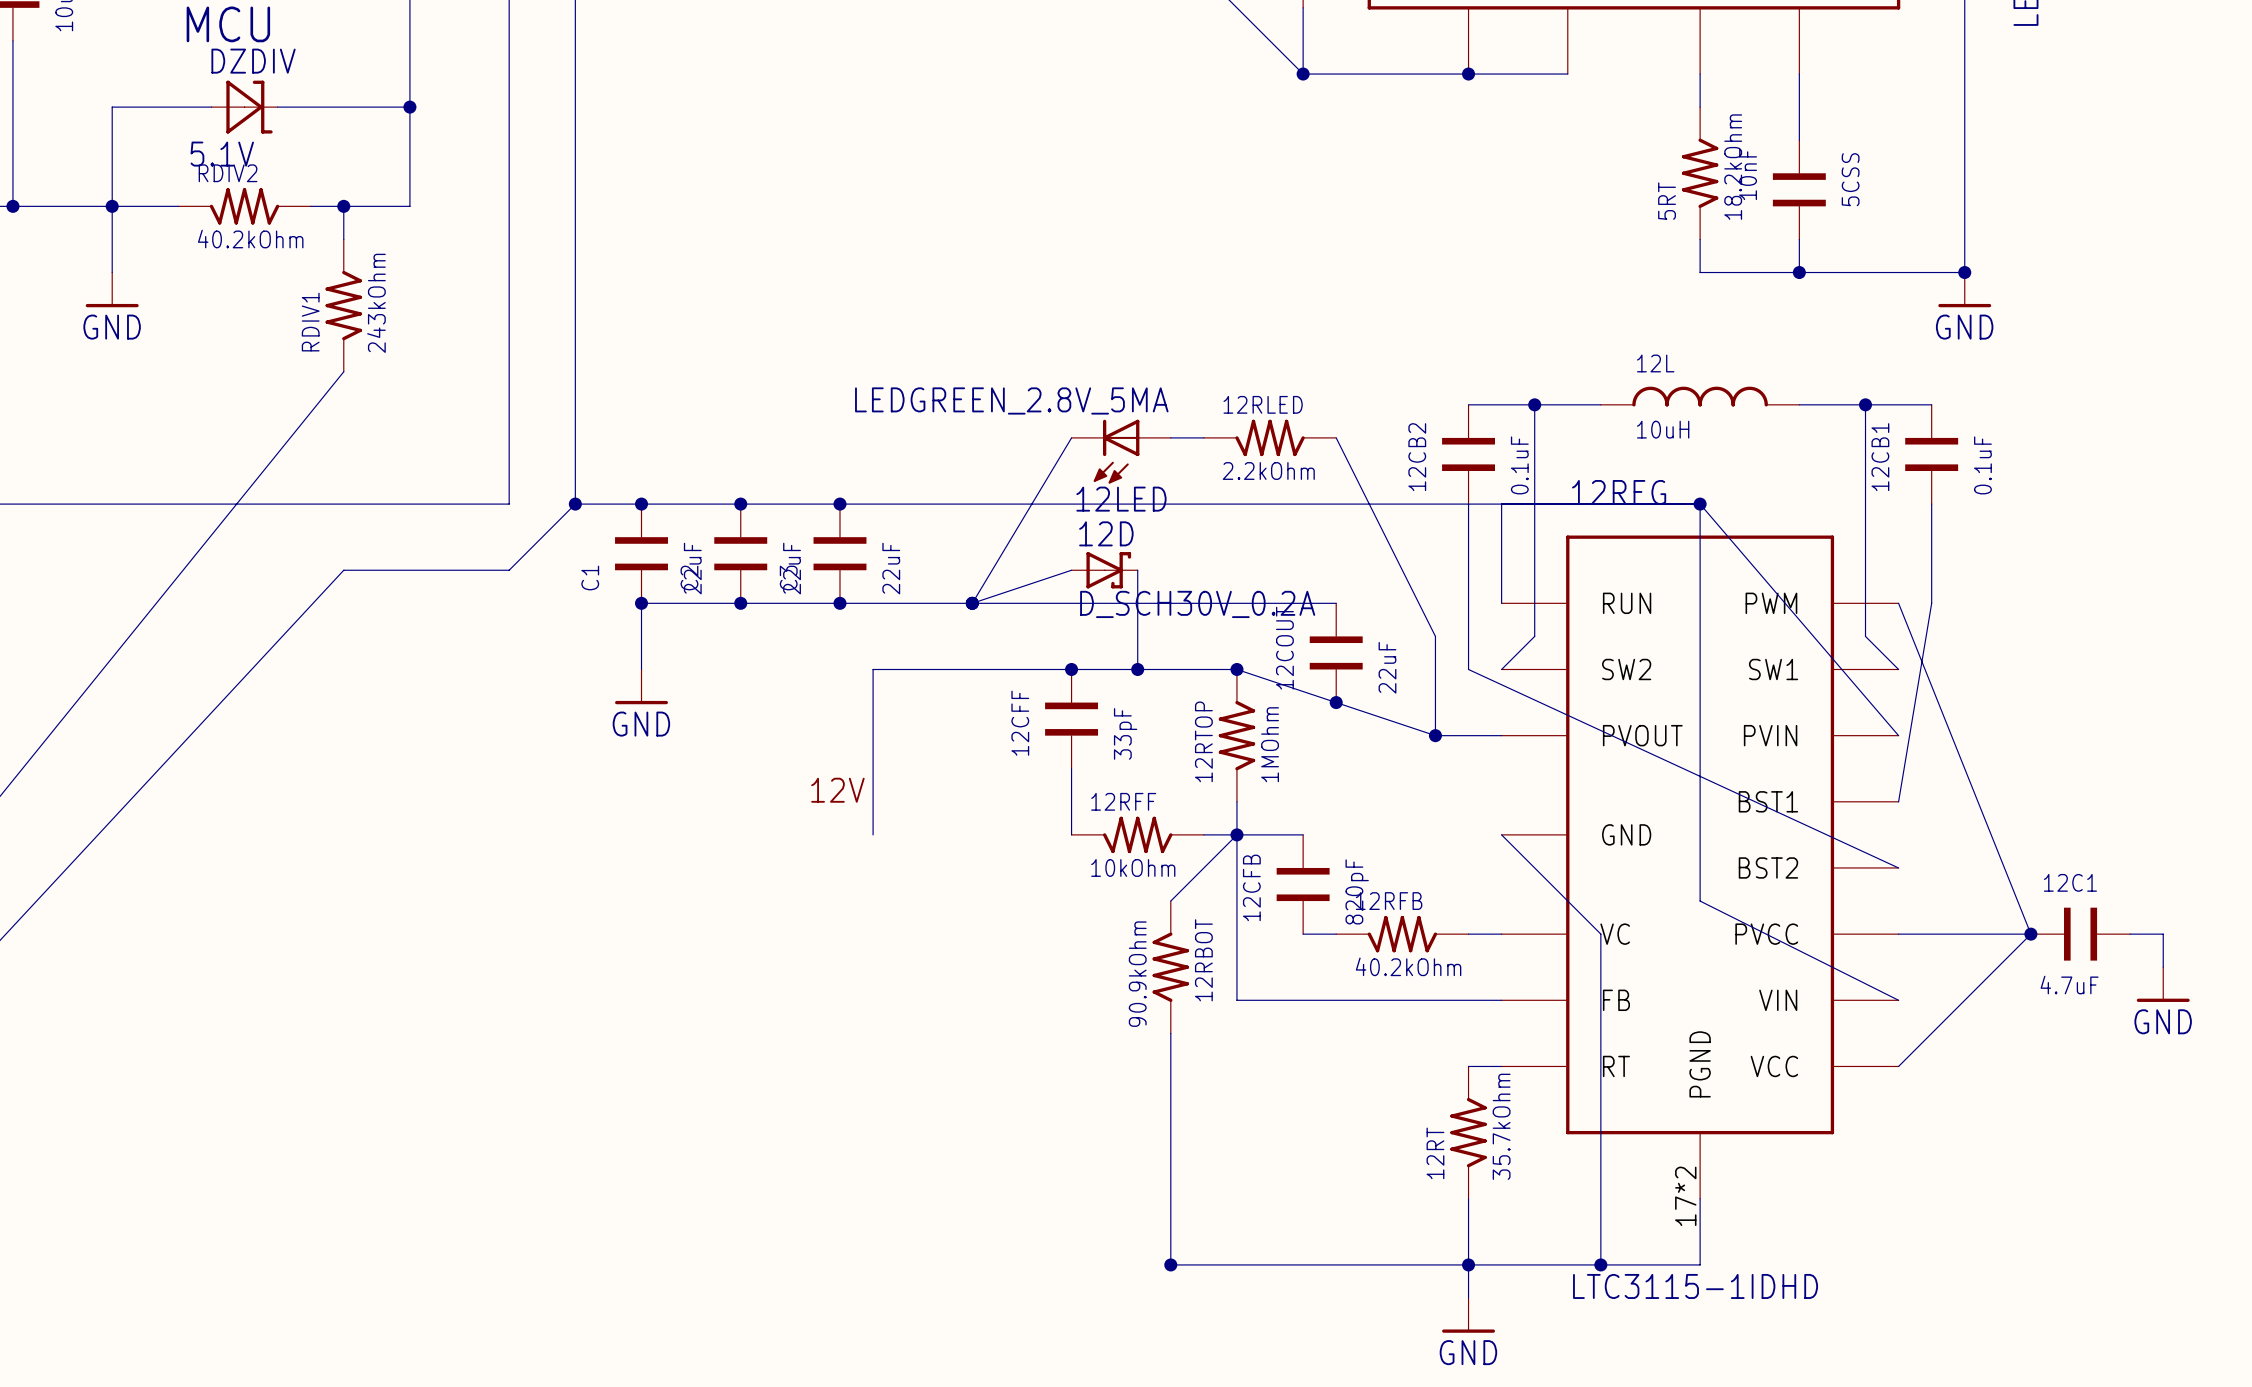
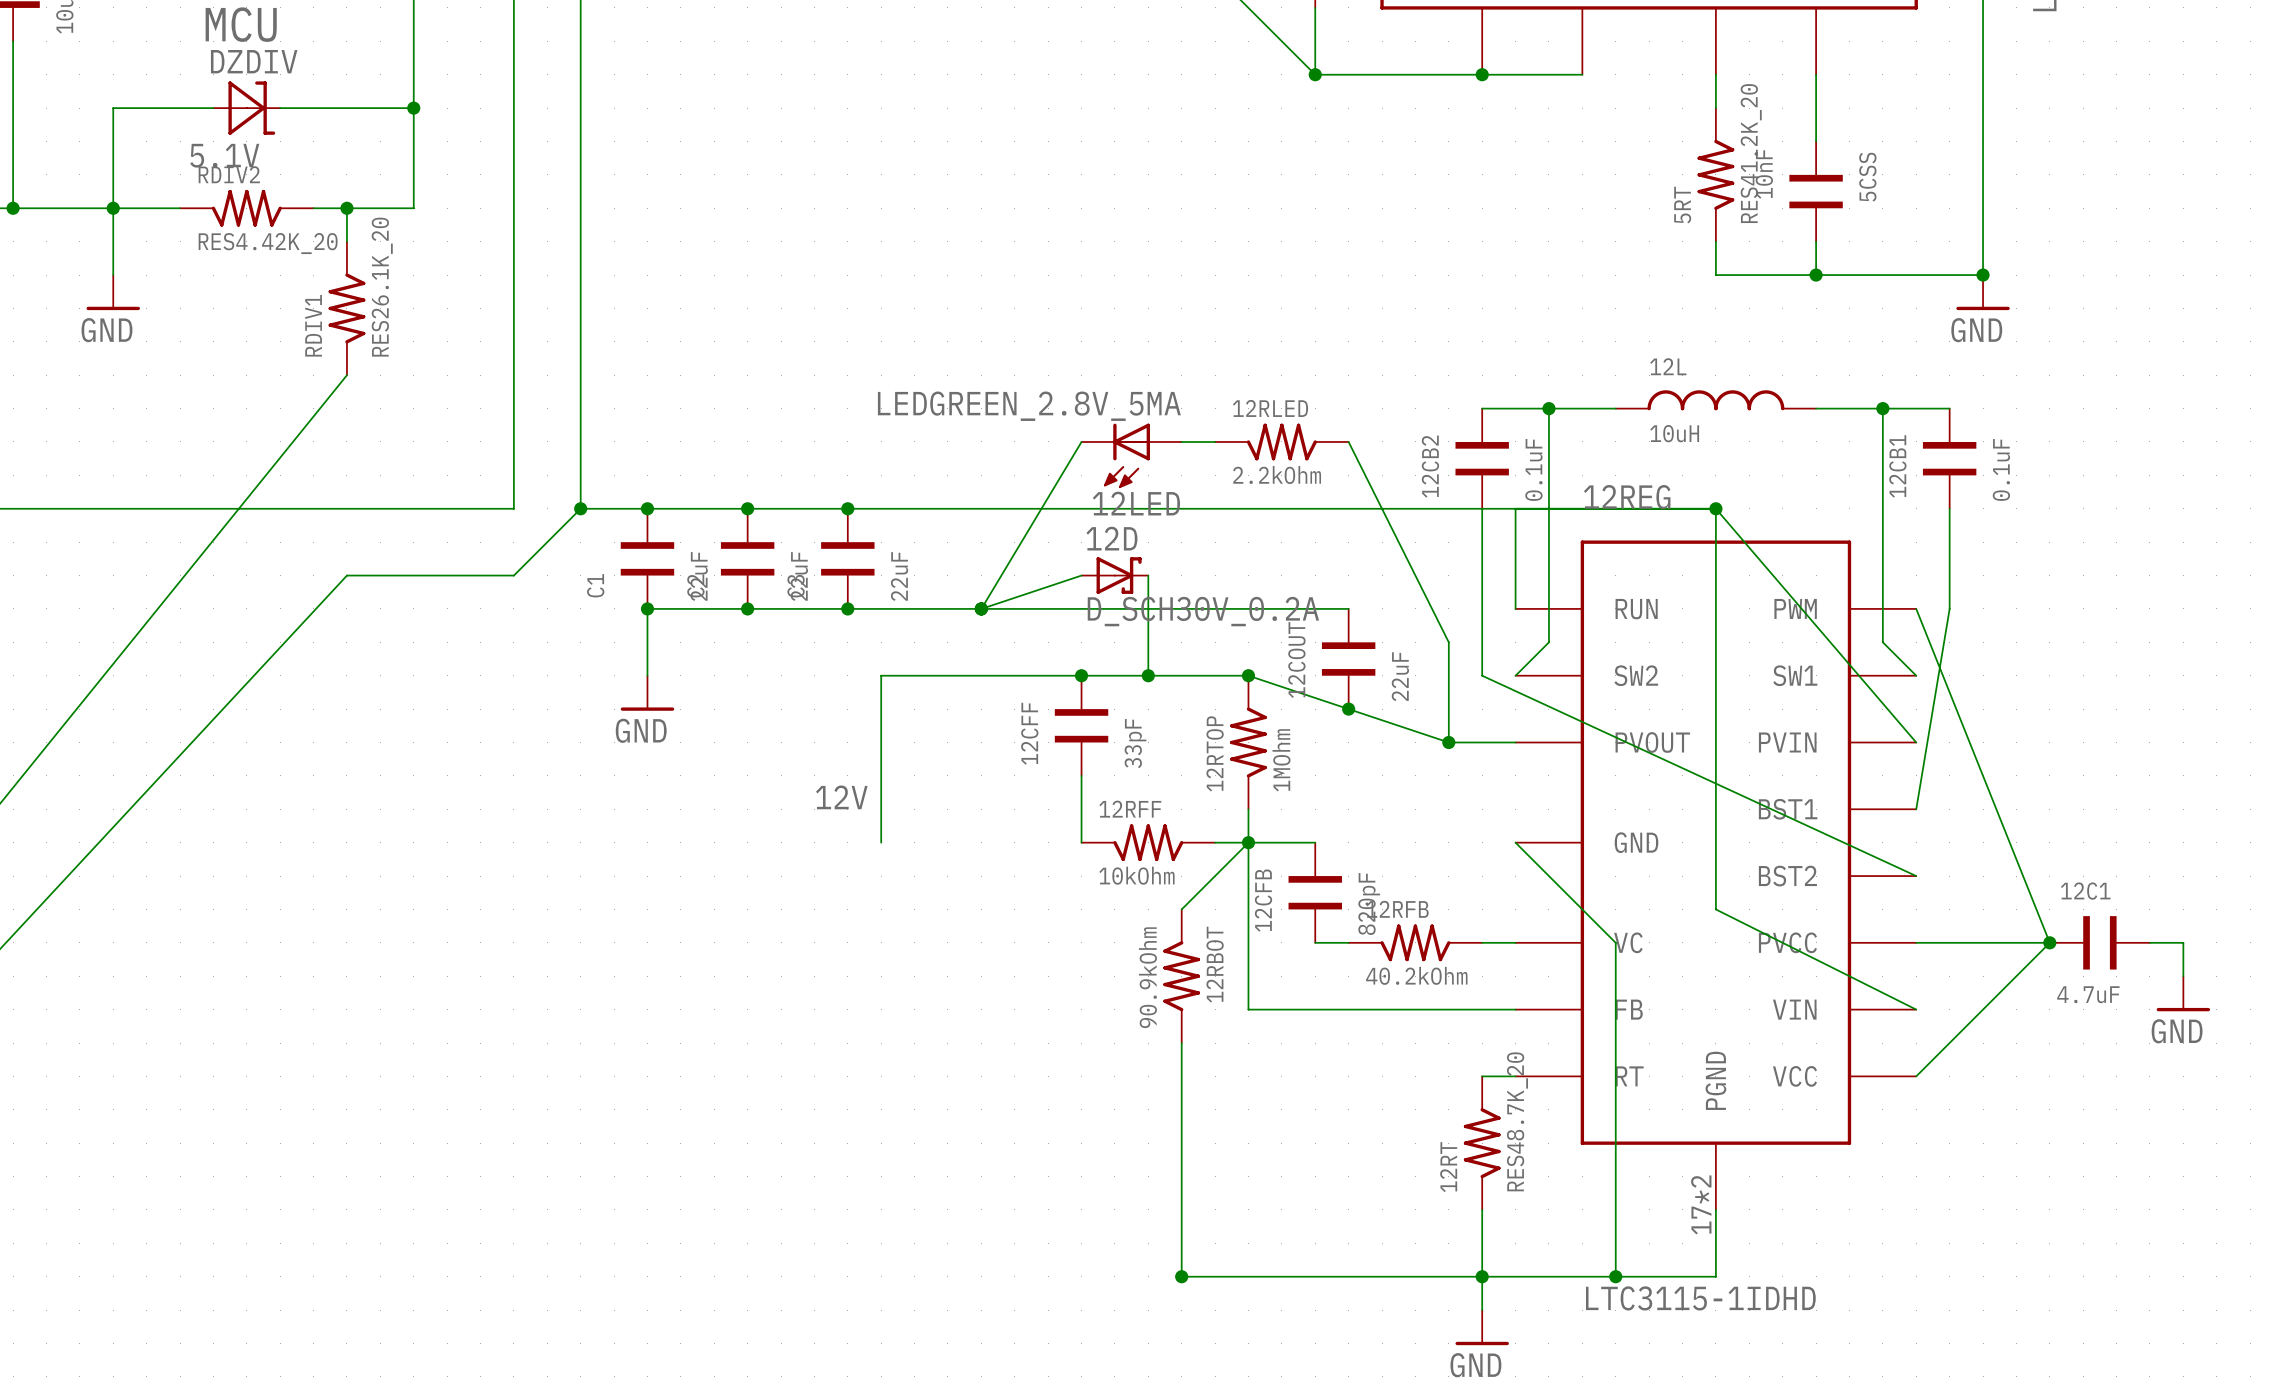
5RT value: 18.2kOhm (1733, 167) -> RES41.2K_20 (1751, 153)
RDIV2 value: 40.2kOhm (250, 239) -> RES4.42K_20 (268, 243)
RDIV1 value: 243kOhm (376, 303) -> RES26.1K_20 (382, 287)
12RT value: 35.7kOhm (1501, 1126) -> RES48.7K_20 (1517, 1121)

